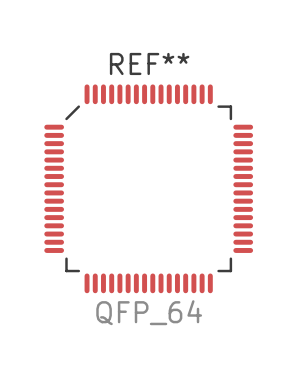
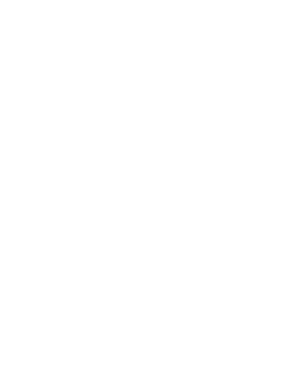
REF**: QFP_64 (148, 188) -> none

